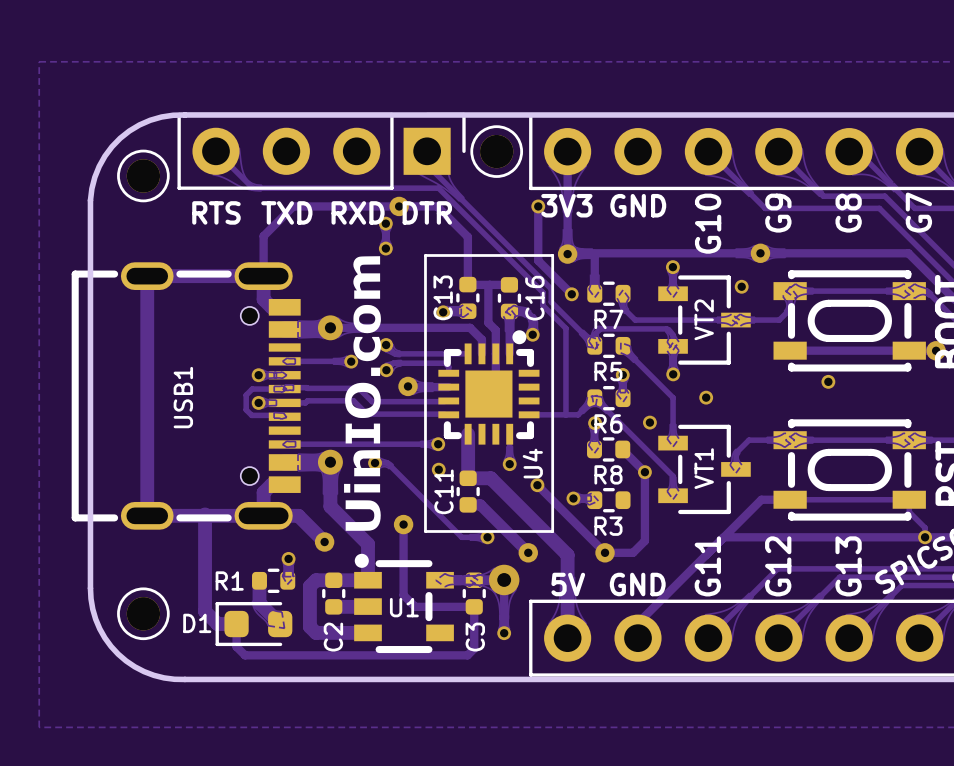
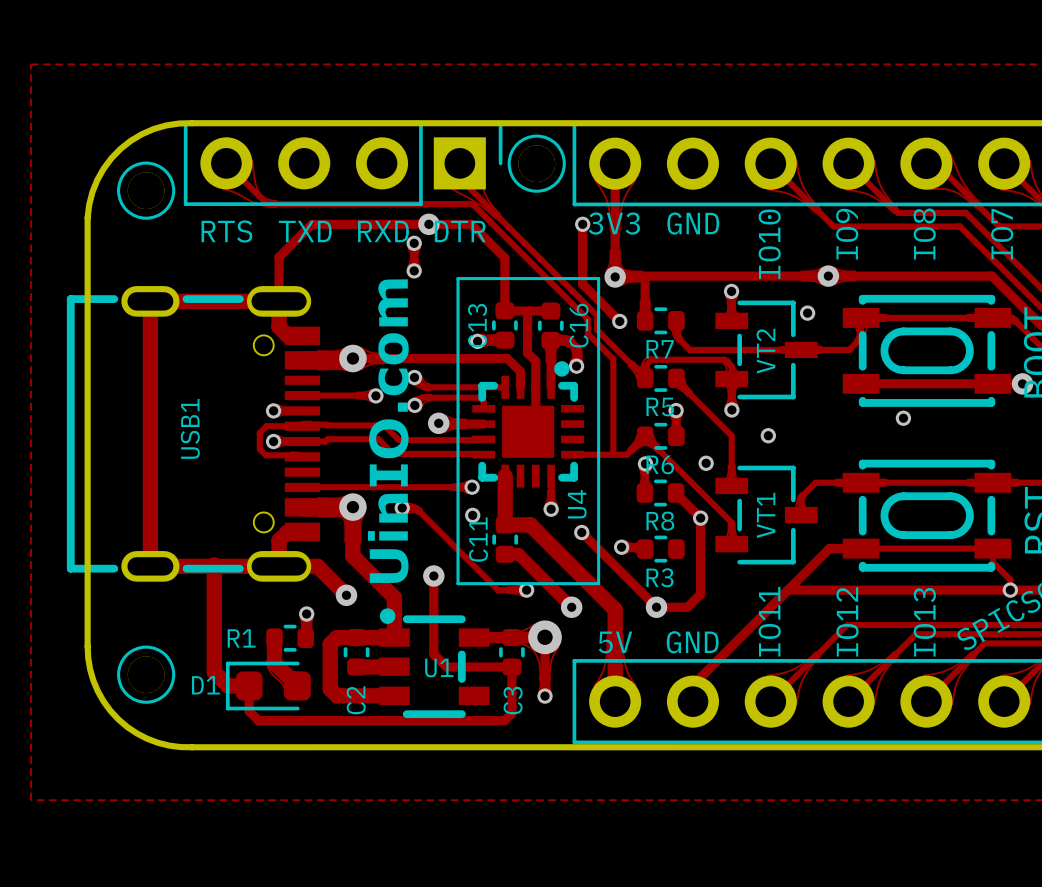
text: G7 (918, 212) -> IO7 (1002, 234)
text: G9 (778, 213) -> IO9 (847, 234)
text: G8 (848, 213) -> IO8 (924, 233)
text: G10 (708, 223) -> IO10 (769, 244)
text: G11 (707, 566) -> IO11 (769, 621)
text: G12 (778, 566) -> IO12 (847, 621)
text: G13 (848, 566) -> IO13 (924, 622)

